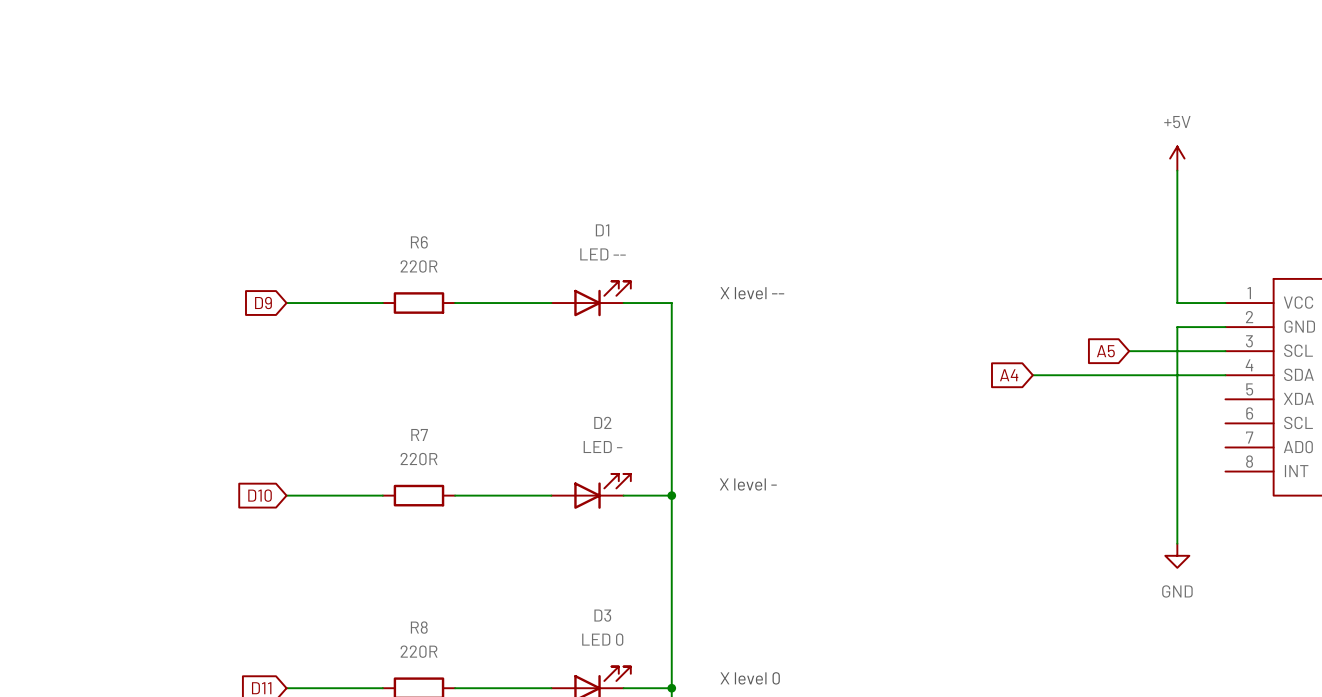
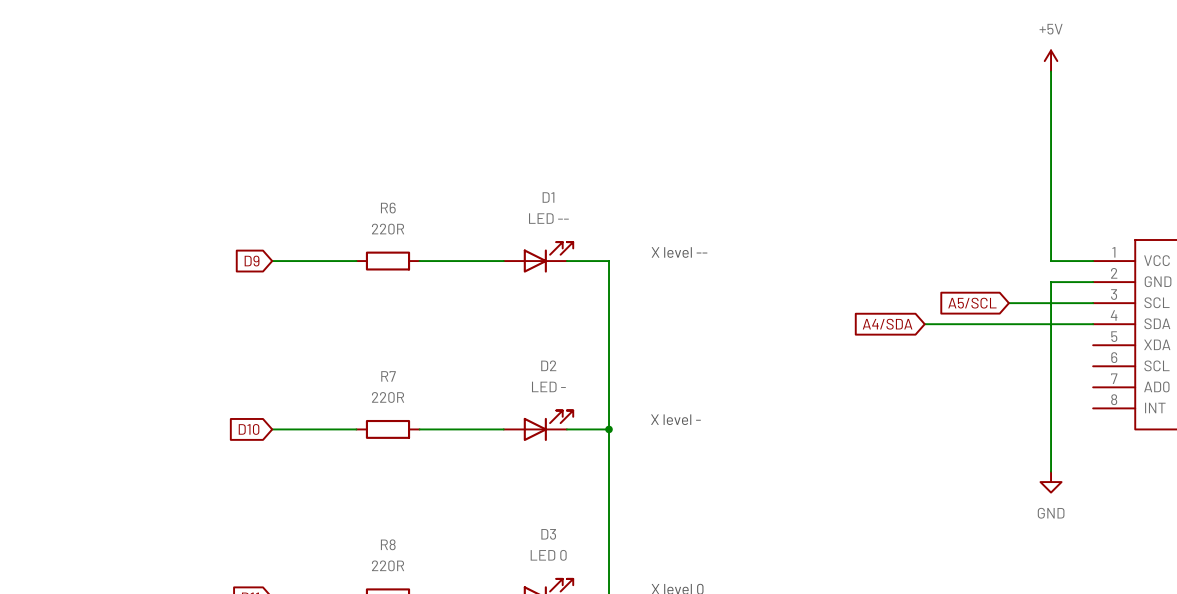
wire: none -> (1051, 71) (1051, 145)
power symbol position: +5V (1177, 158) -> +5V (1051, 61)
global label: A5 (1105, 351) -> A5/SCL (972, 303)
global label: A4 (1009, 375) -> A4/SDA (887, 324)

